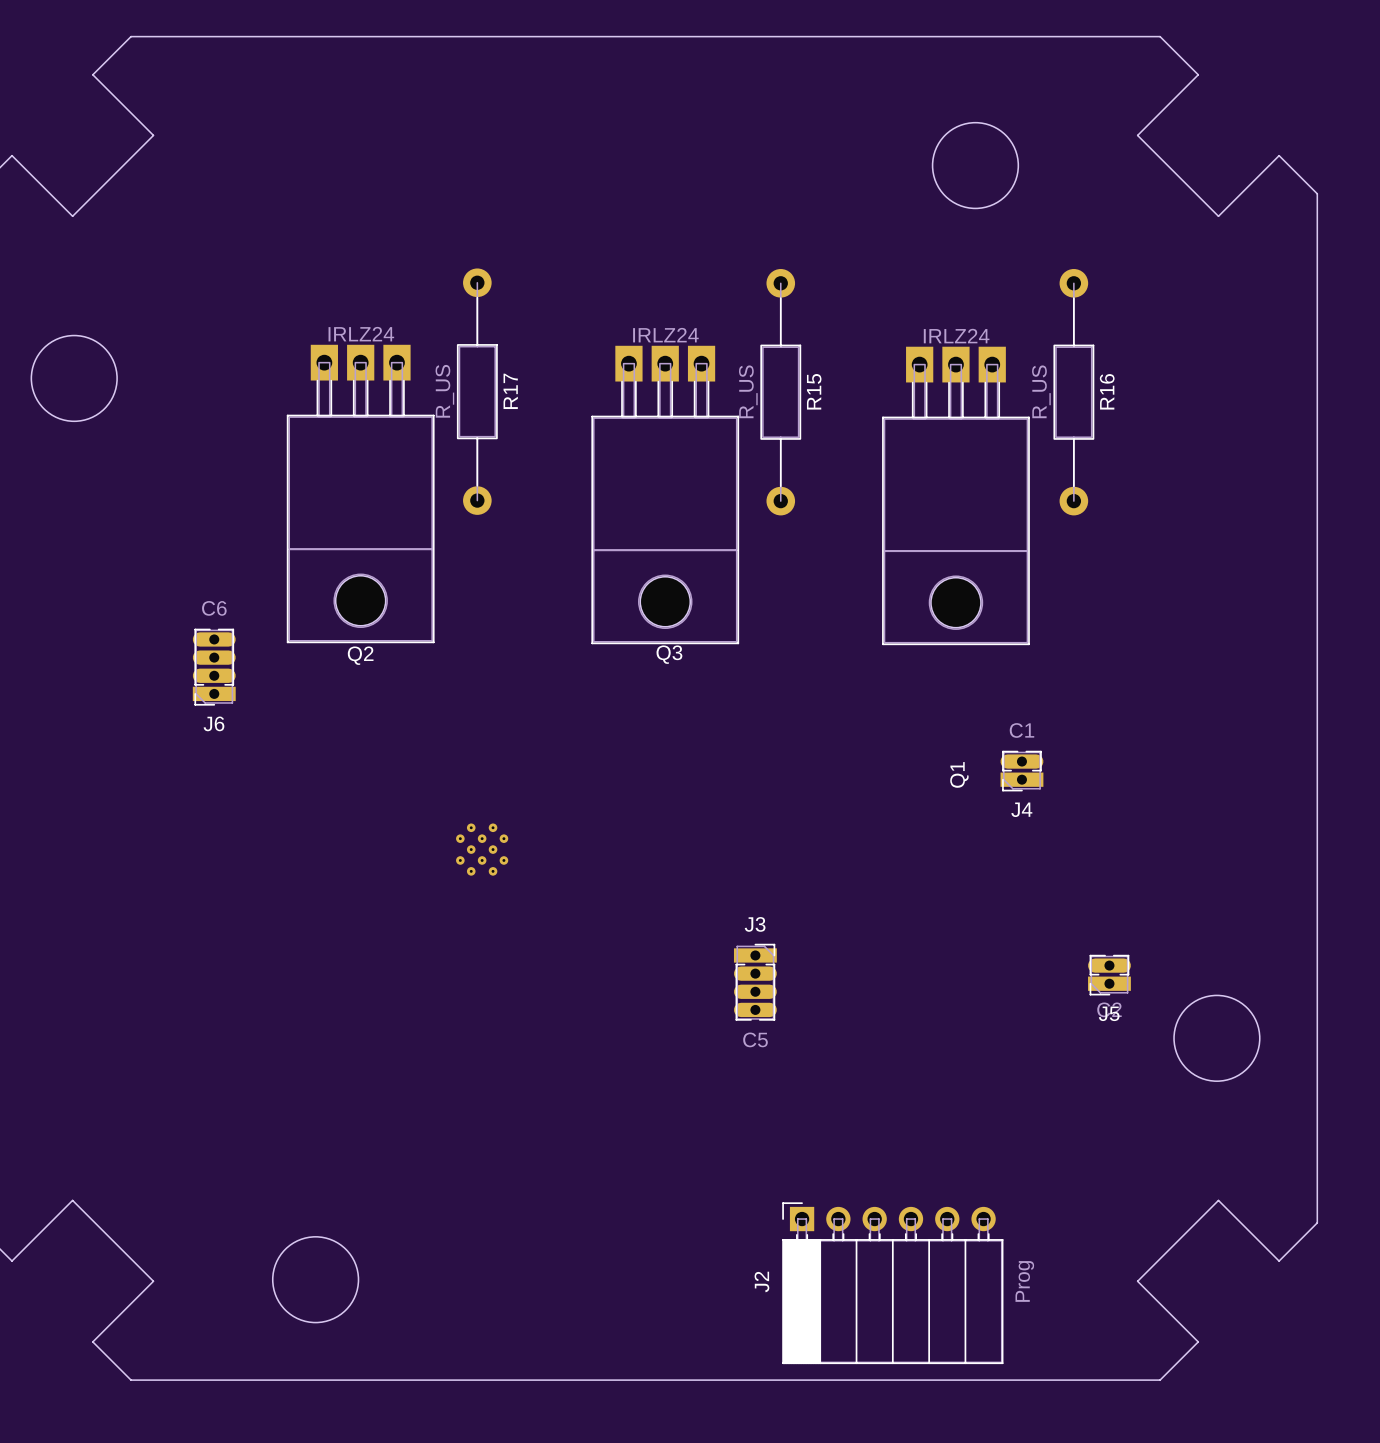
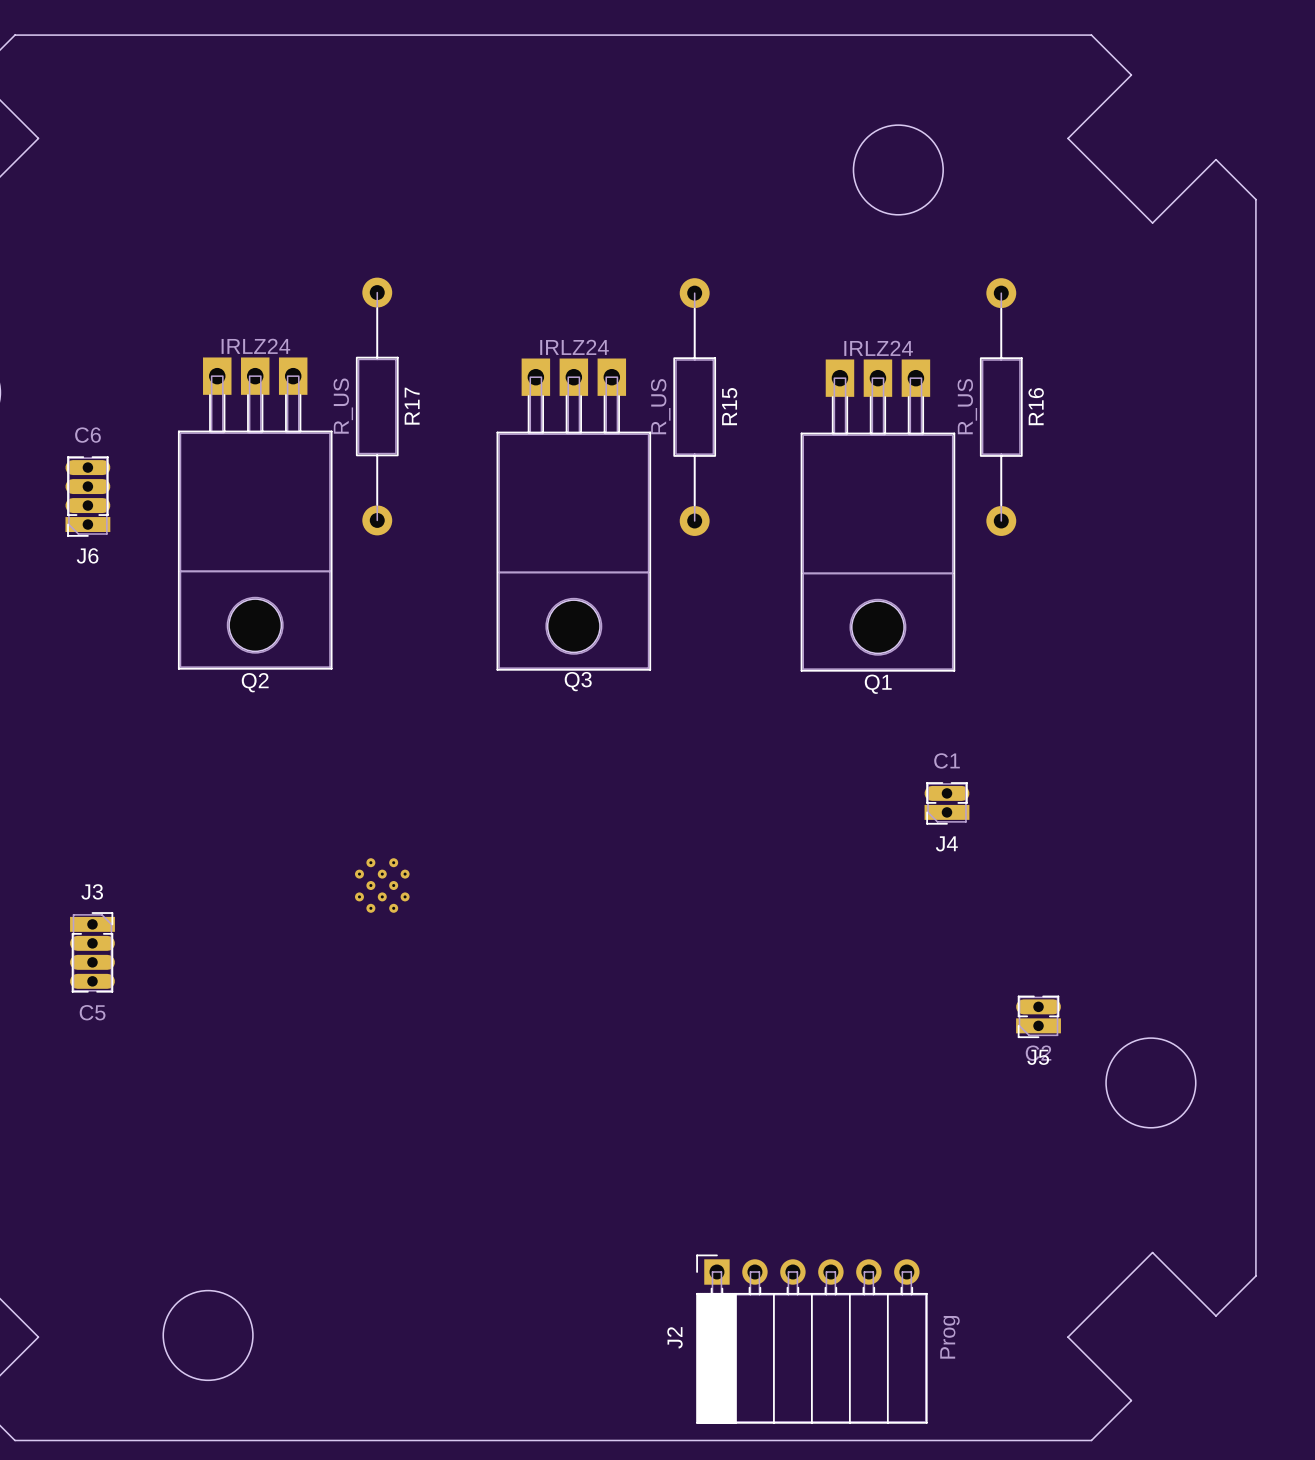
J6 position: (214, 667) -> (87, 496)
Q1 name rotation: 0° (959, 774) -> 90° clockwise (878, 684)
Q1 name position: Q1 (959, 774) -> Q1 (878, 684)
J3 position: (755, 982) -> (92, 952)

